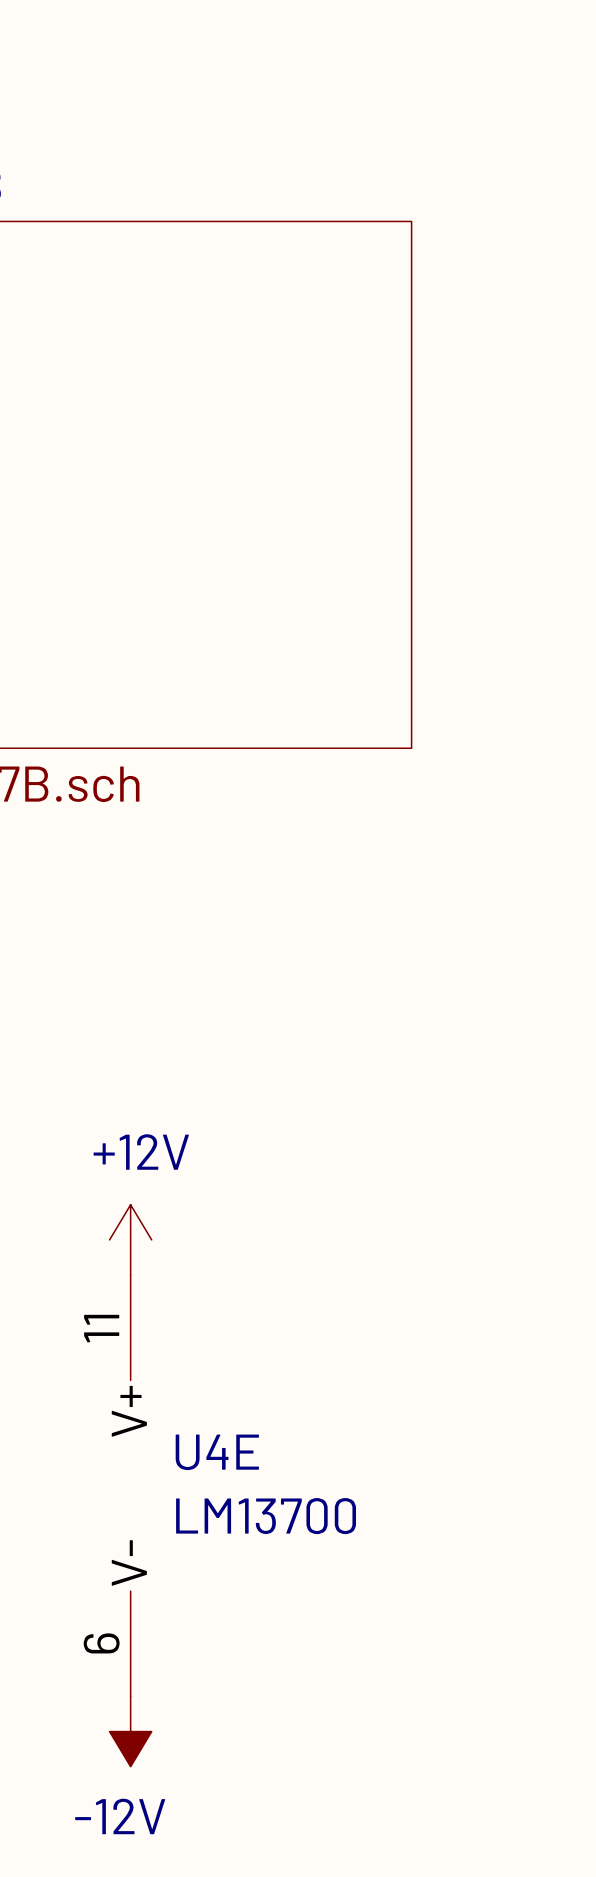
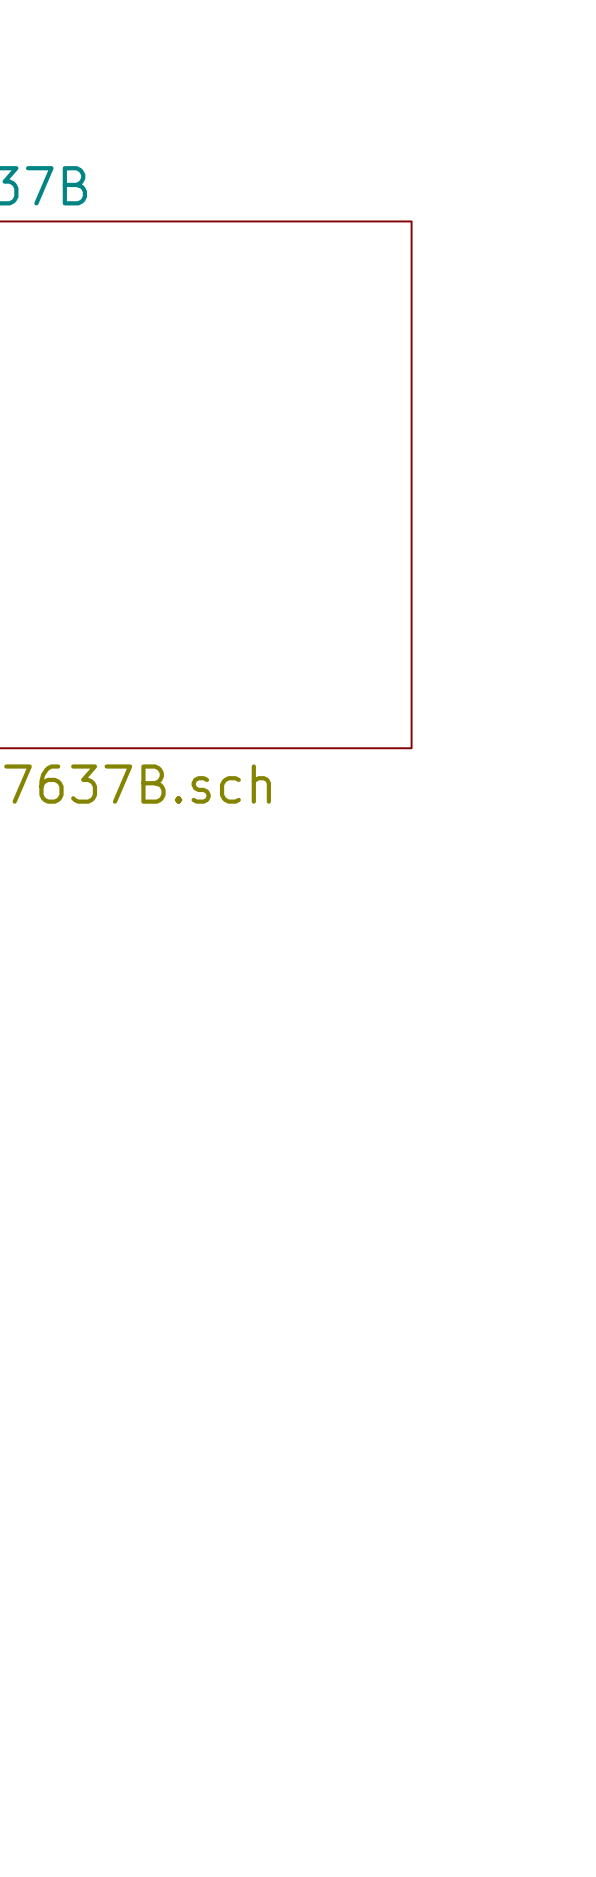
power symbol: +12V (130, 1239) -> none
U4E: LM13700 (130, 1485) -> none
power symbol: -12V (130, 1731) -> none

